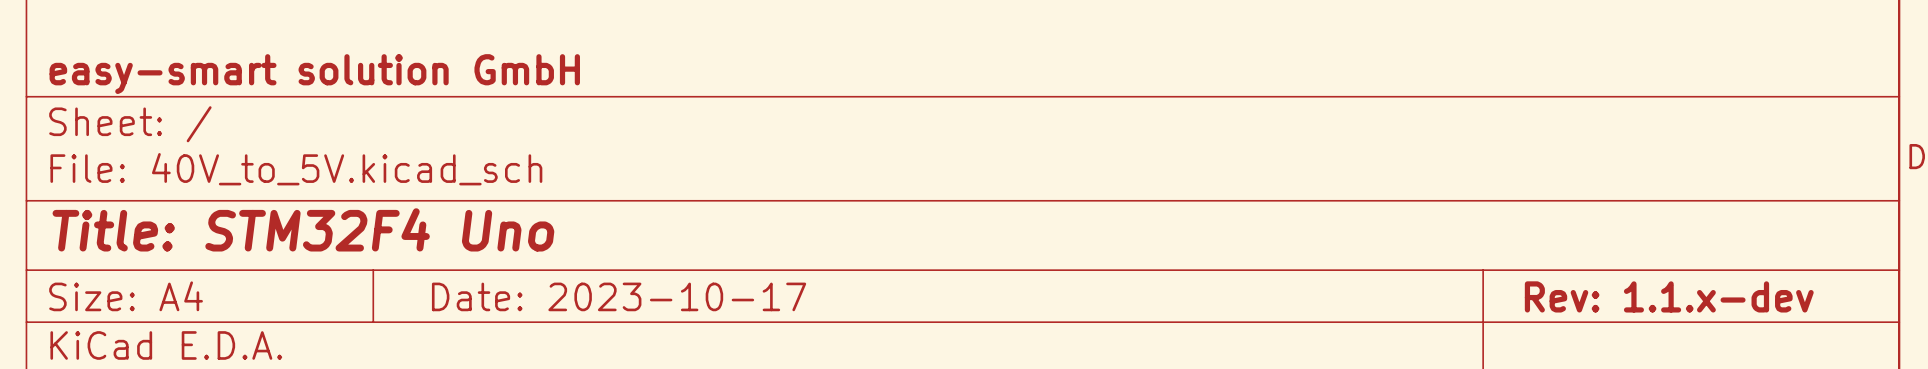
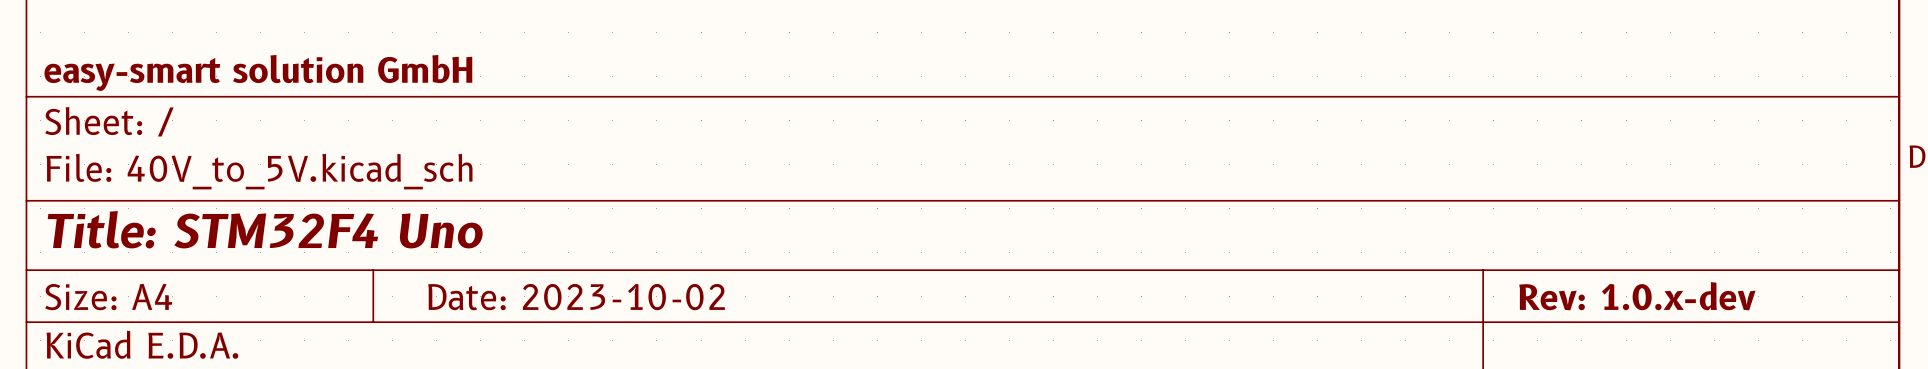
title block: Date: 2023-10-17 (619, 296) -> Date: 2023-10-02 (576, 297)
title block: Rev: 1.1.x-dev (1669, 296) -> Rev: 1.0.x-dev (1637, 296)

